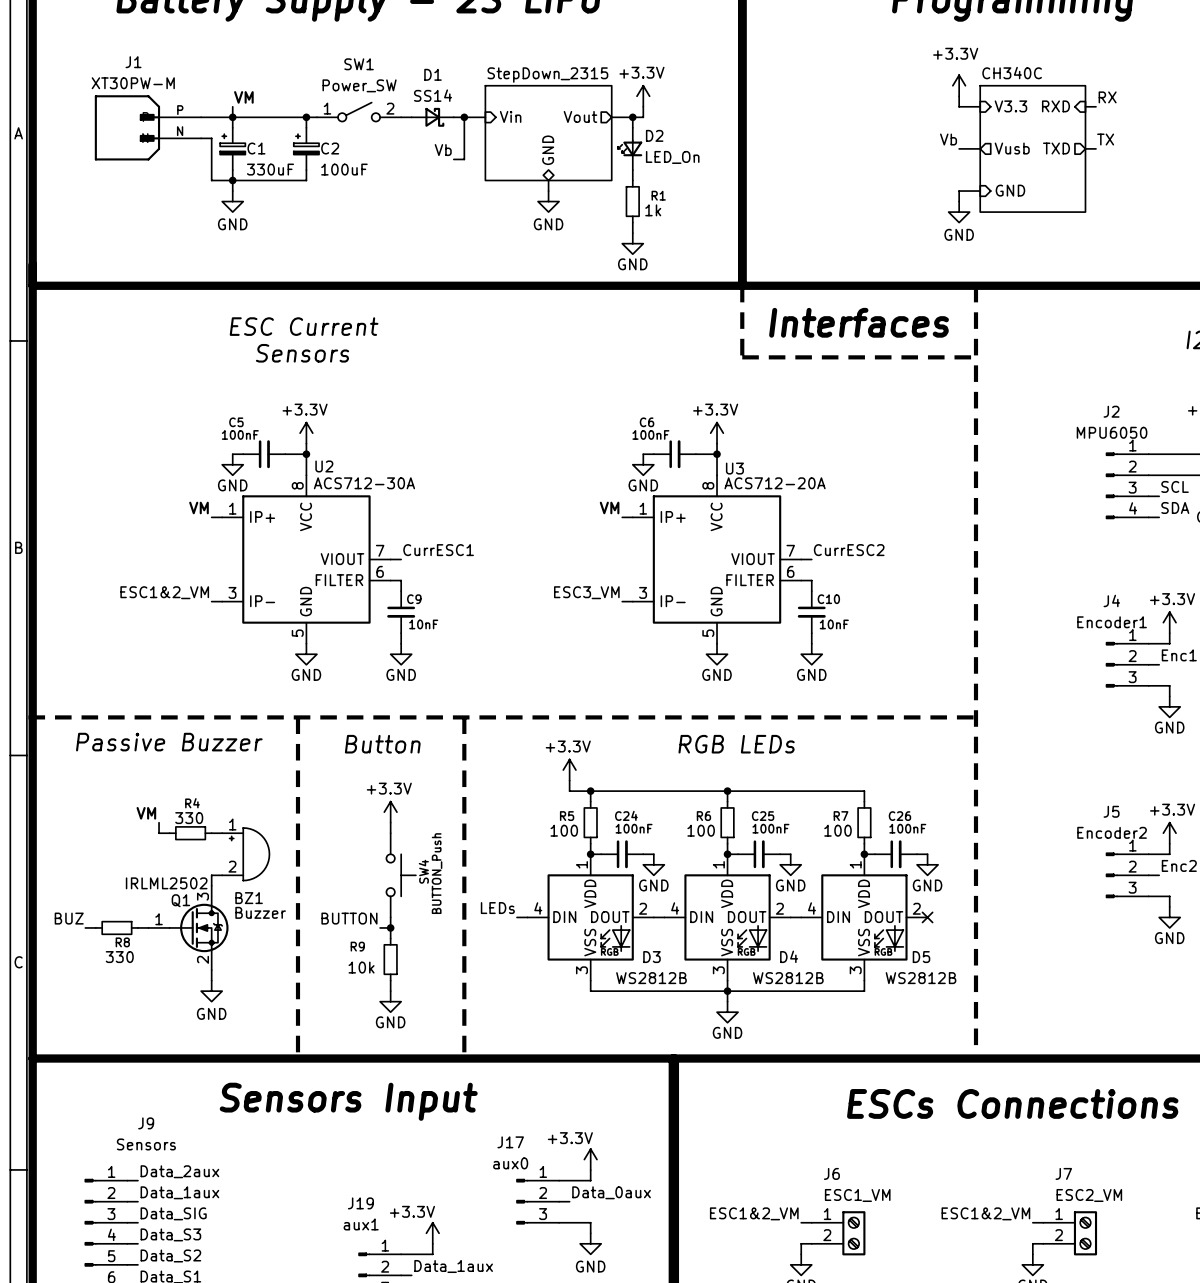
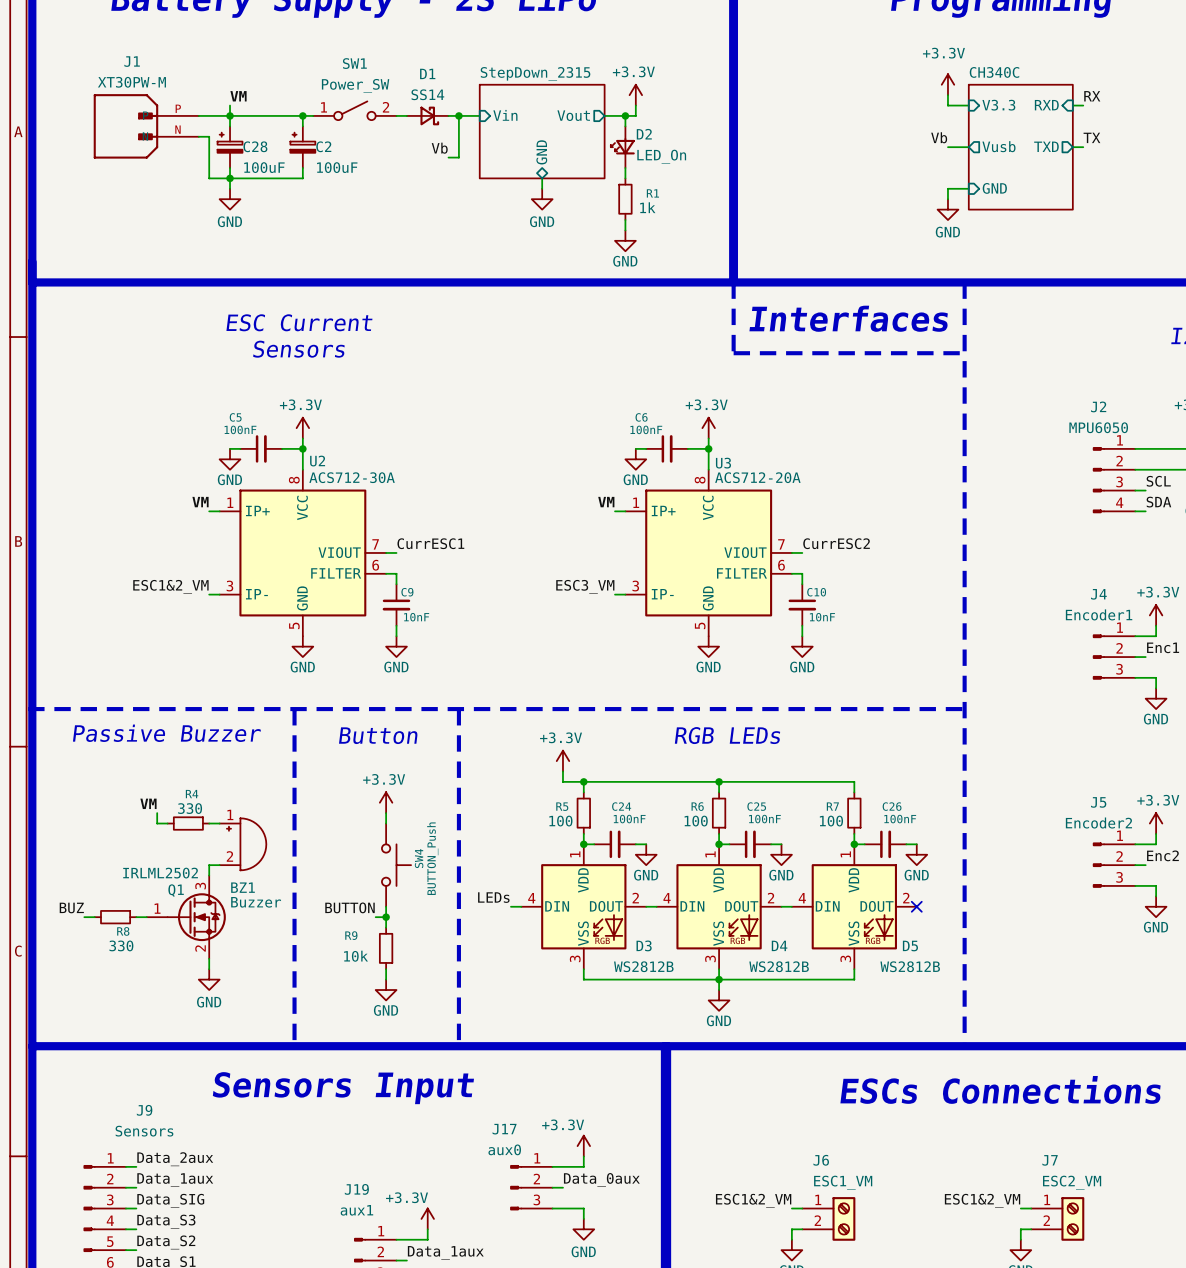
C1 name: C1 (256, 148) -> C28 (255, 146)
C1 value: 330uF (270, 169) -> 100uF (264, 167)

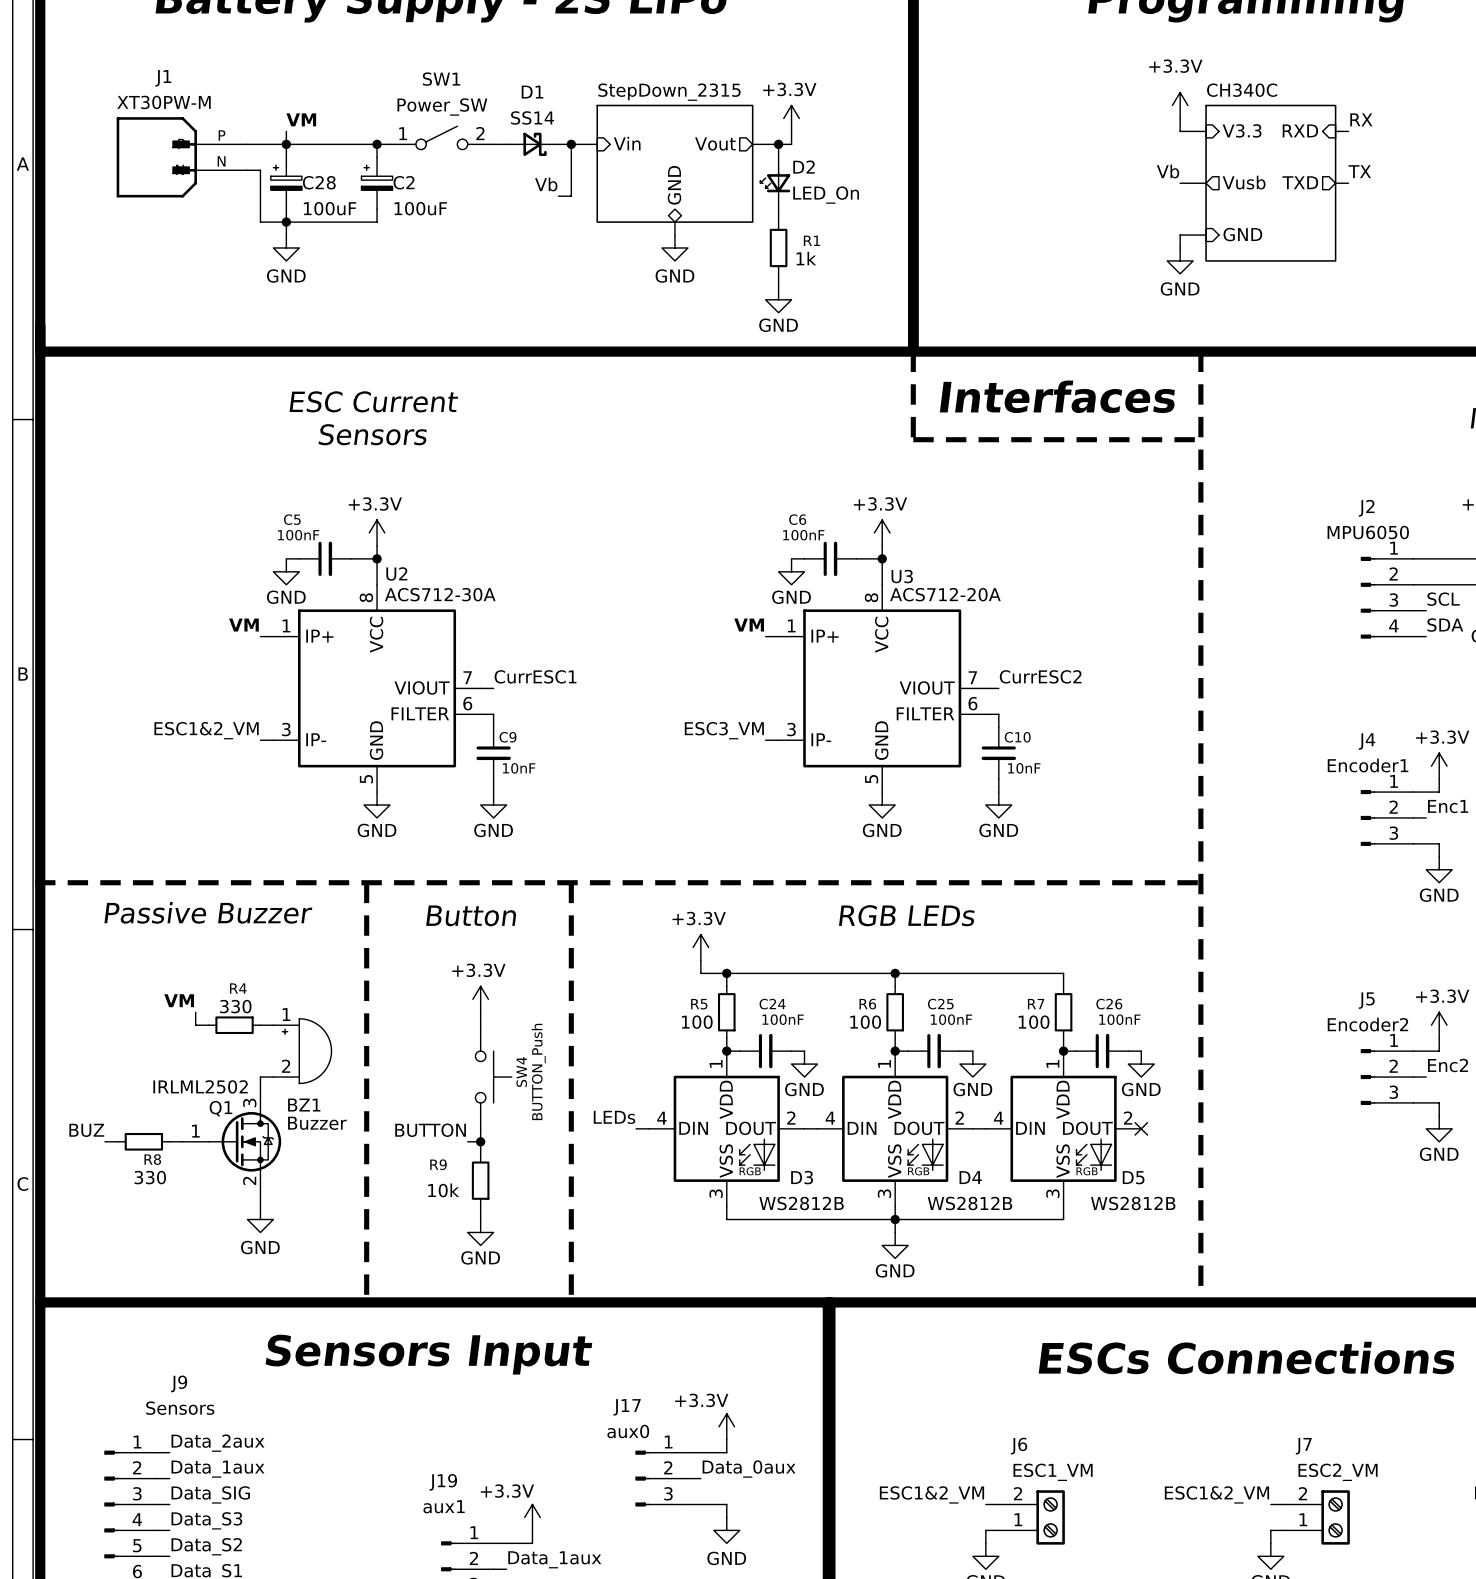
J6 pin number: 1 (818, 1199) -> 2 (1017, 1493)
J7 pin number: 1 (1047, 1199) -> 2 (1302, 1493)
J6 pin number: 2 (817, 1220) -> 1 (1018, 1519)
J7 pin number: 2 (1046, 1220) -> 1 (1303, 1519)

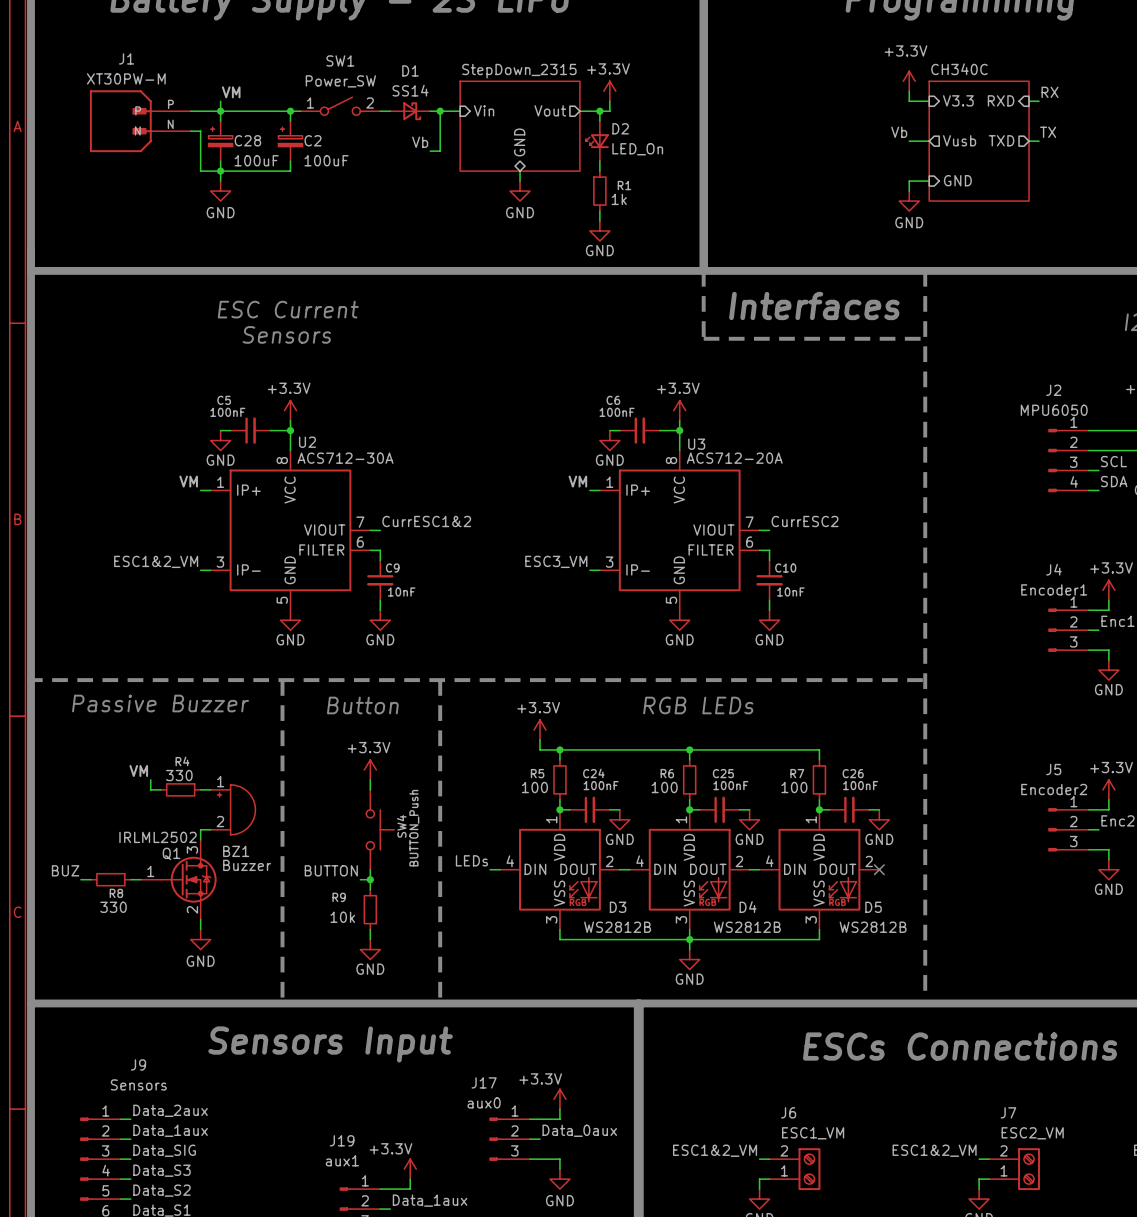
label: CurrESC1 (535, 676) -> CurrESC1&2 (426, 521)

